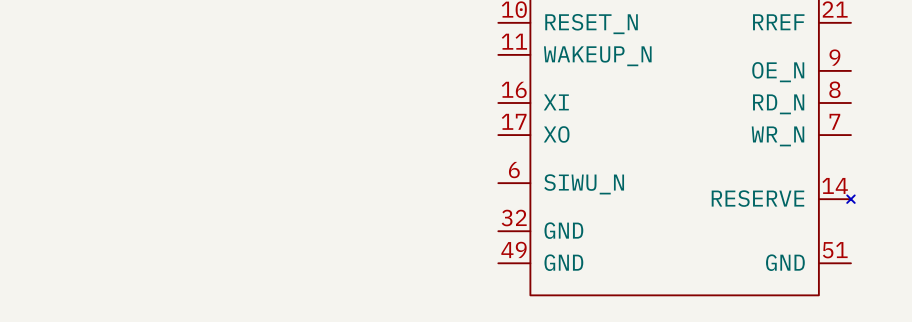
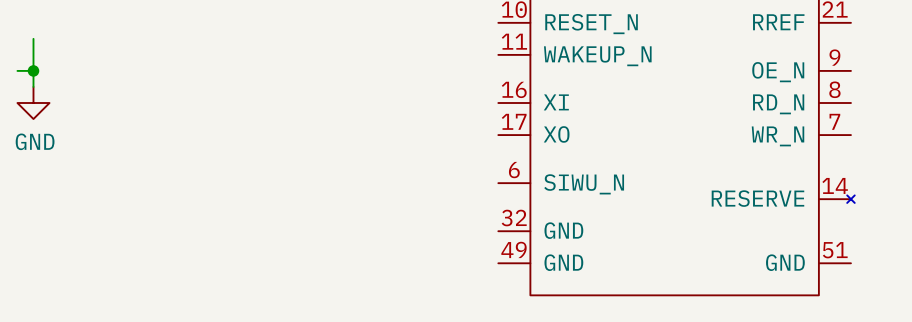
wire: none -> (33, 38) (33, 86)
wire: none -> (17, 70) (33, 70)
junction: none -> (33, 70)
power symbol: none -> GND (33, 103)

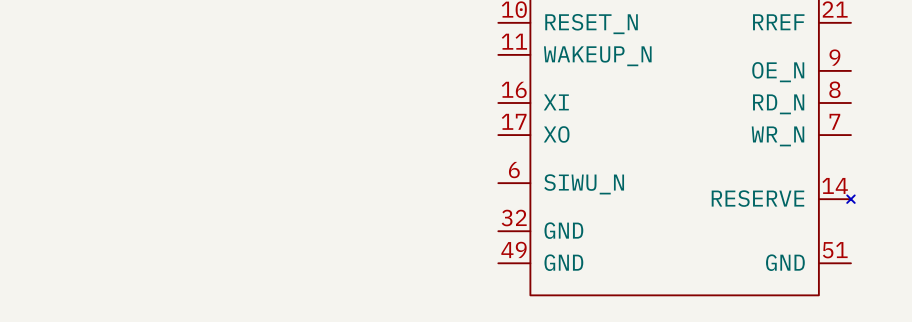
wire: (33, 38) (33, 86) -> none
wire: (17, 70) (33, 70) -> none
junction: (33, 70) -> none
power symbol: GND (33, 103) -> none

